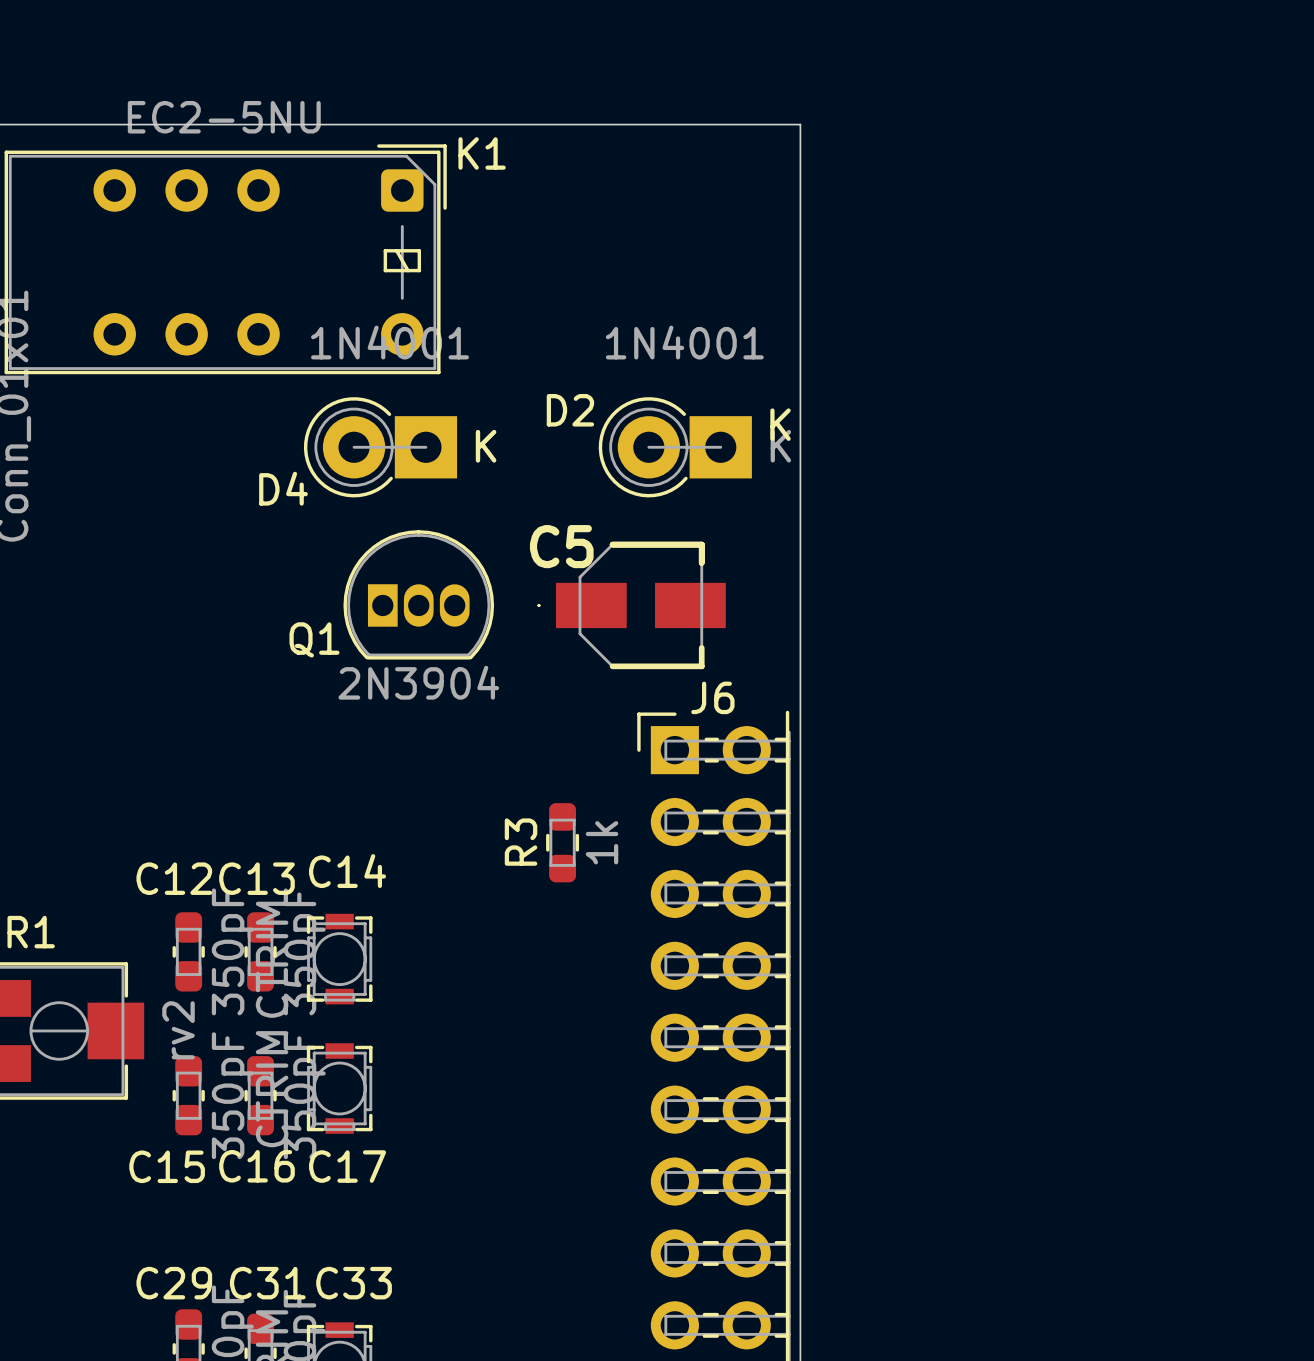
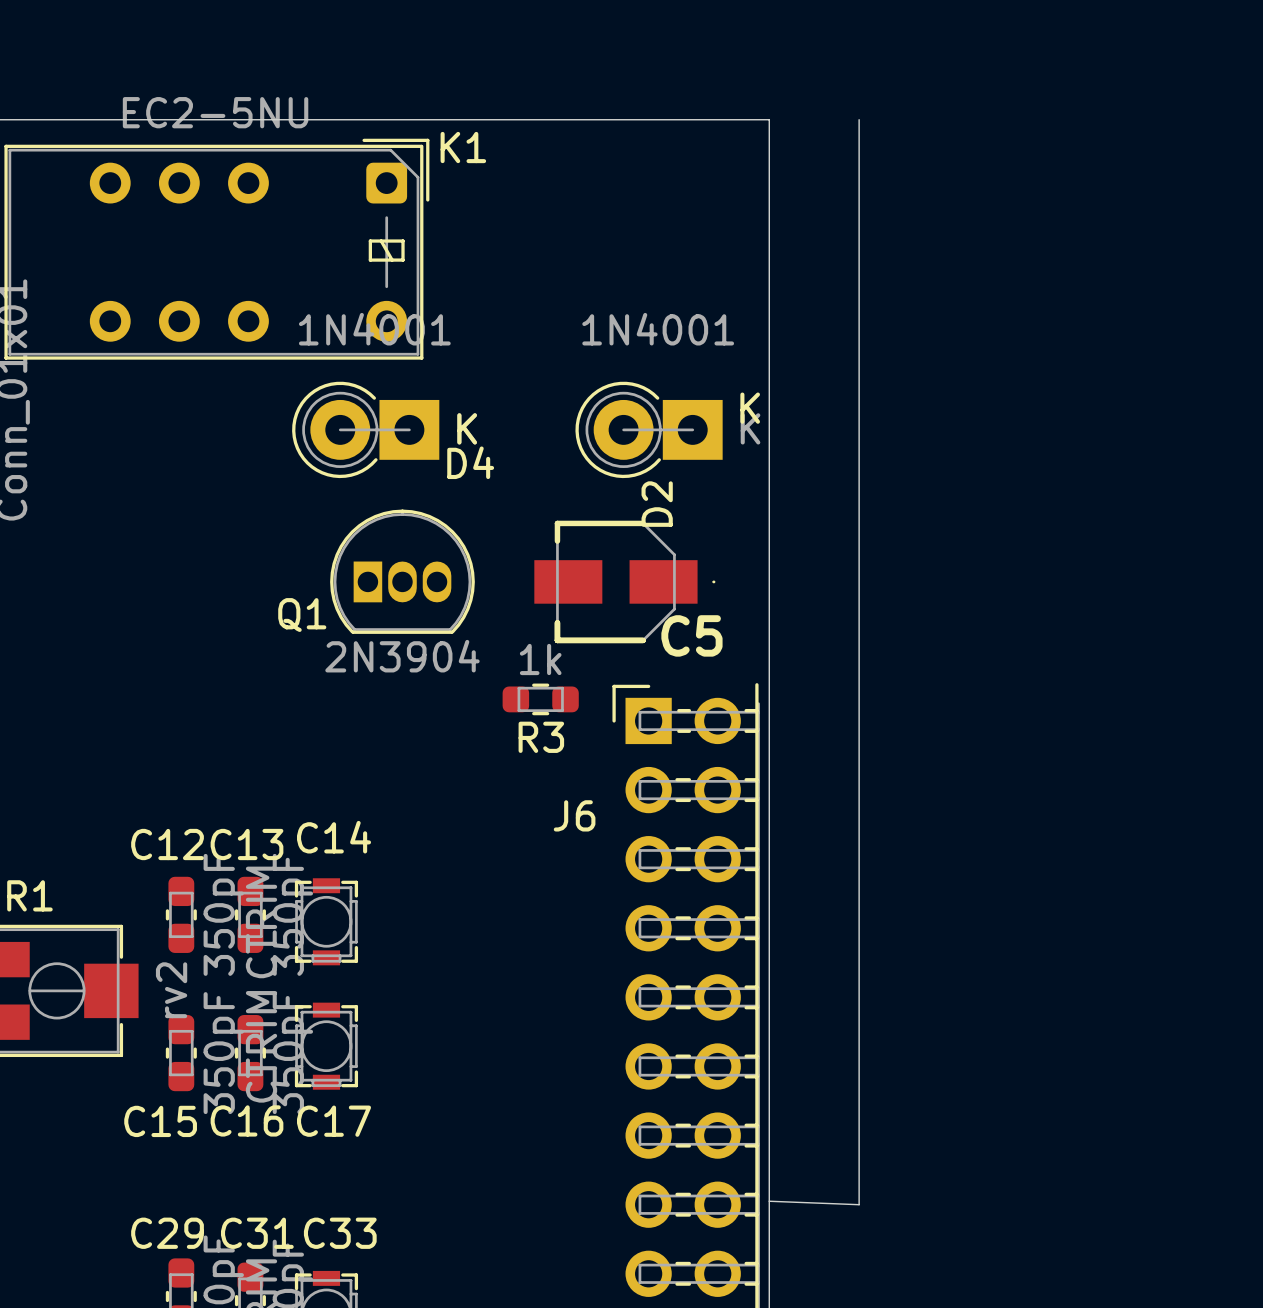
board edge: none -> (859, 119) (859, 1204) (769, 1201)
D2 name rotation: 0° (570, 410) -> 90° counterclockwise (657, 504)
D2 name position: D2 (570, 410) -> D2 (657, 504)
D4 name position: D4 (283, 488) -> D4 (470, 462)
C5 rotation: 0° (631, 605) -> 180° (624, 581)
J6 name position: J6 (712, 697) -> J6 (574, 815)
R3 name position: R3 (521, 842) -> R3 (541, 737)
R3 rotation: 0° (562, 842) -> 90° clockwise (540, 699)
R3 position: (562, 842) -> (540, 699)
R3 value position: 1k (601, 842) -> 1k (540, 659)

